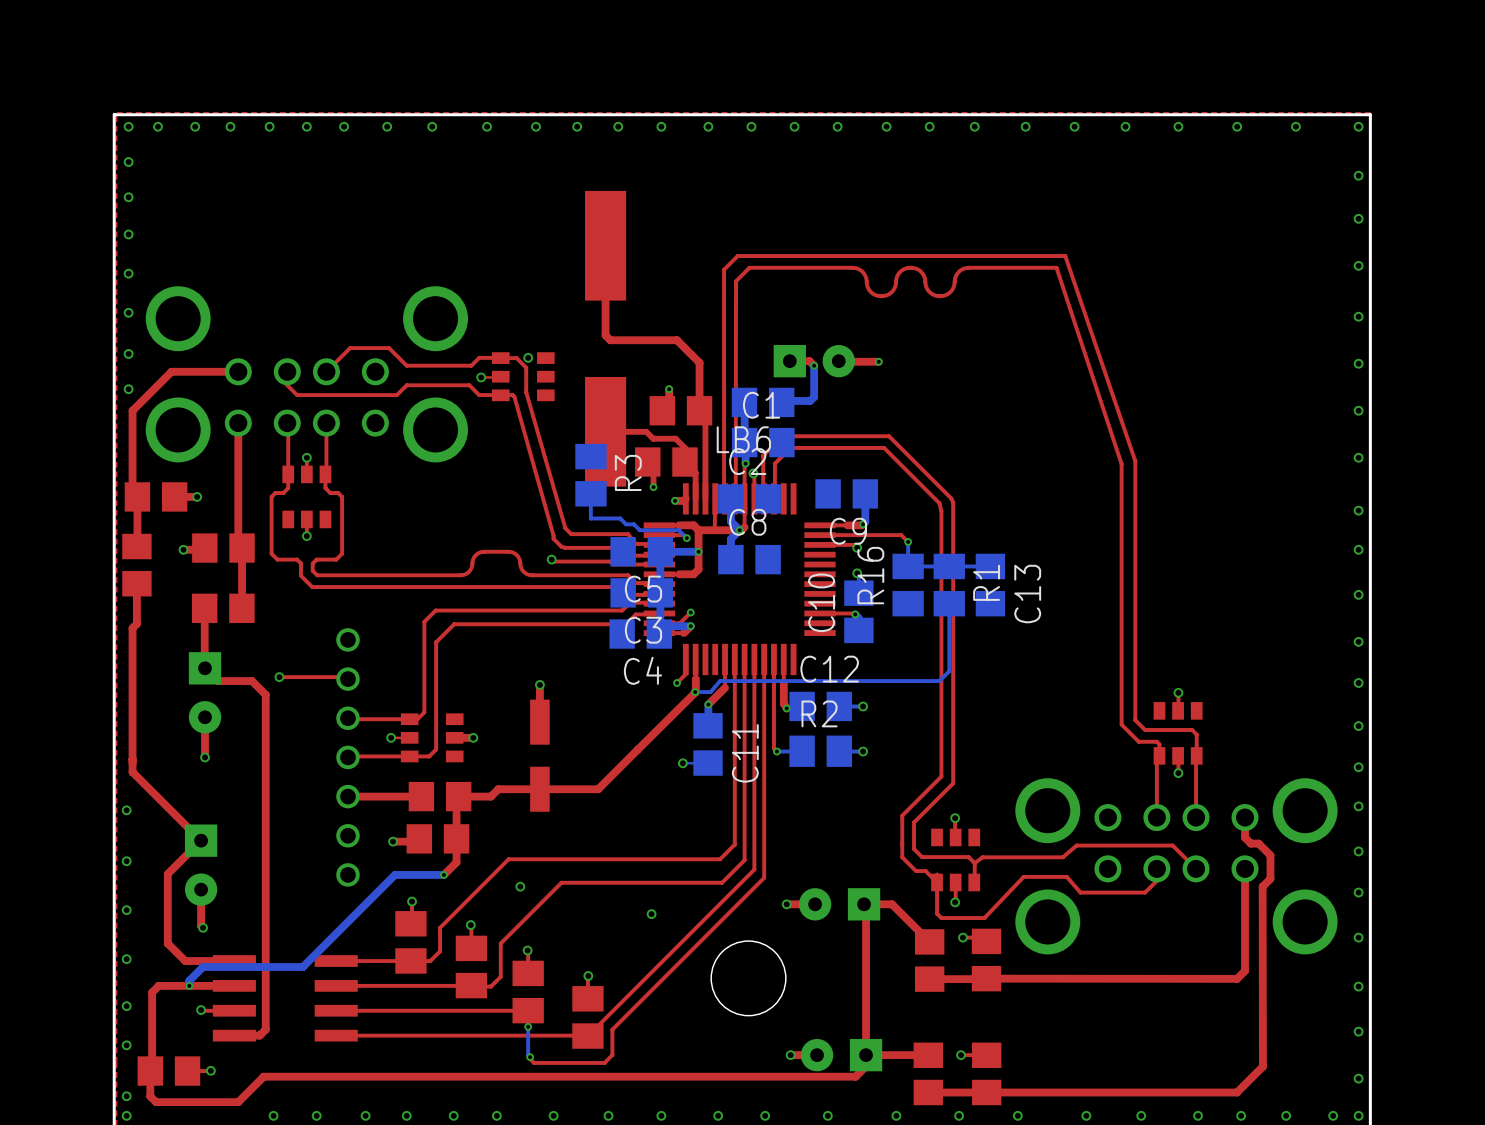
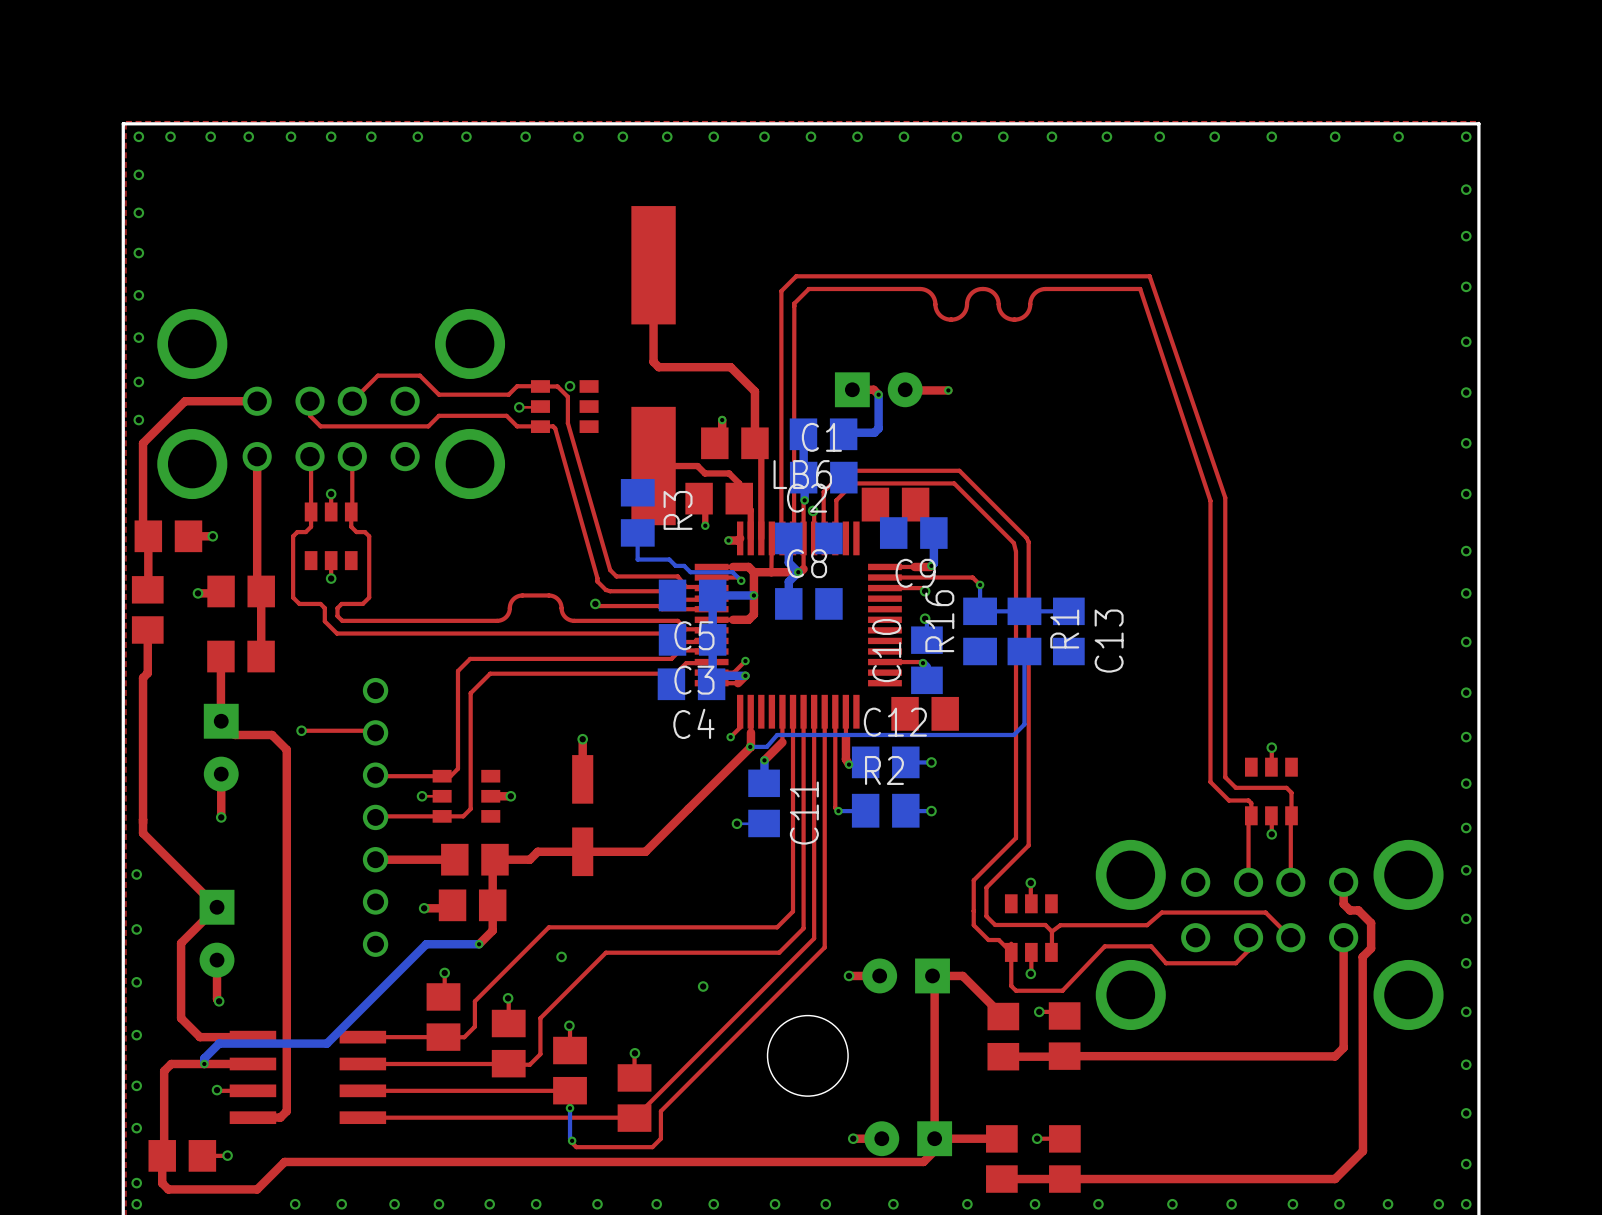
part: none -> (895, 504)
part: none -> (925, 713)

